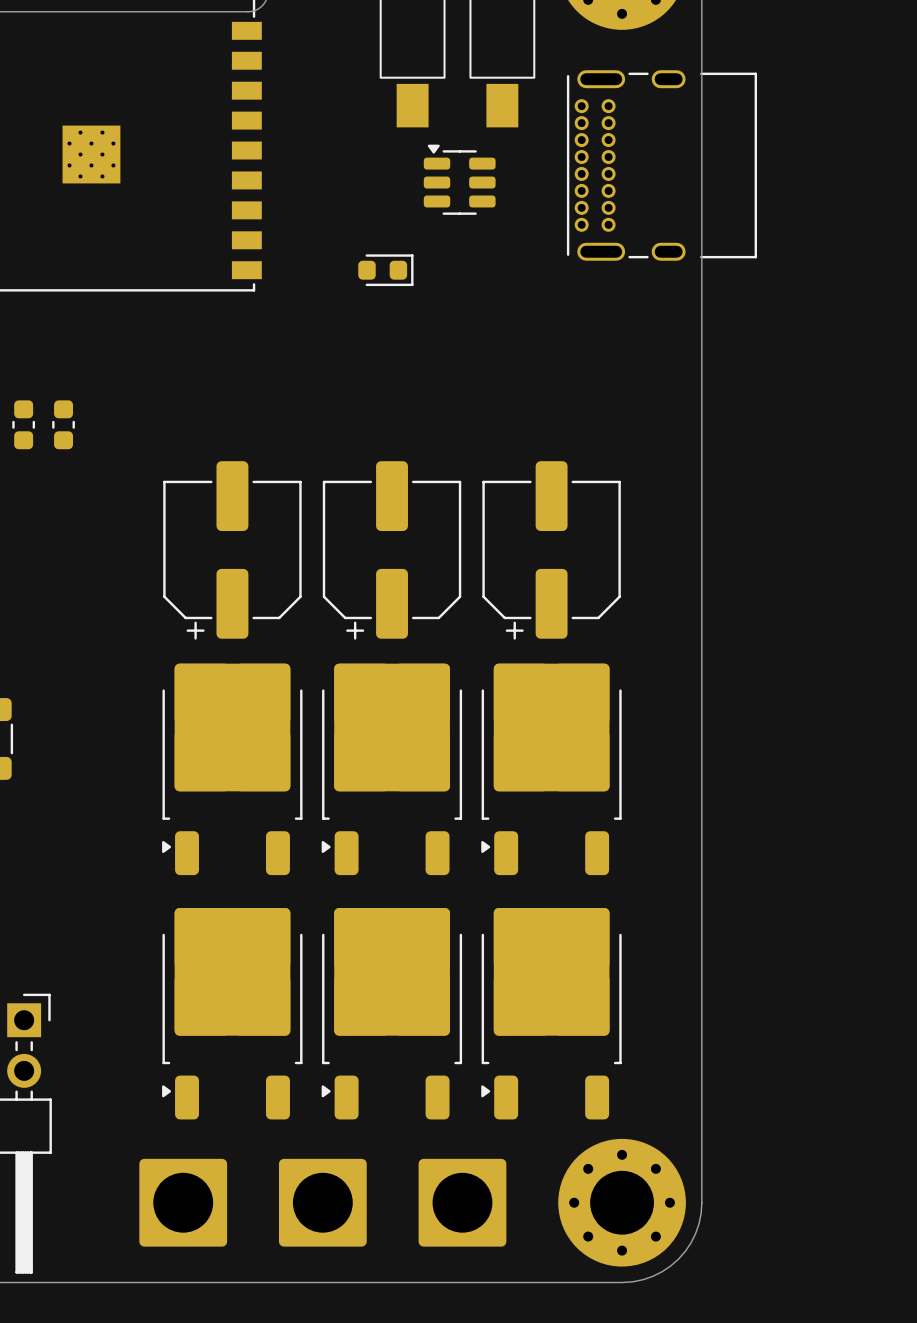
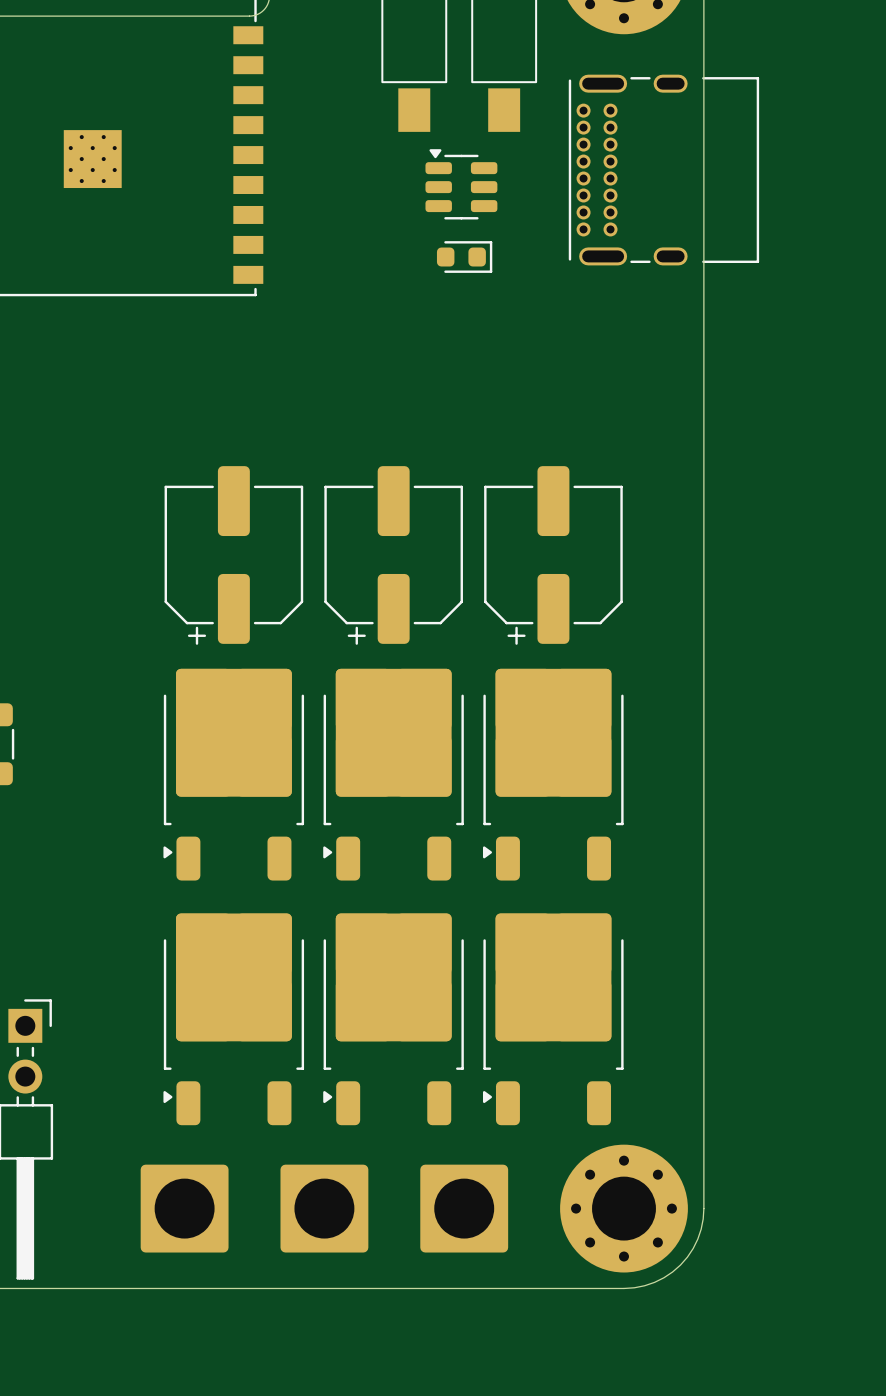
part position: (385, 270) -> (464, 257)
part: (23, 424) -> none
part: (63, 424) -> none

